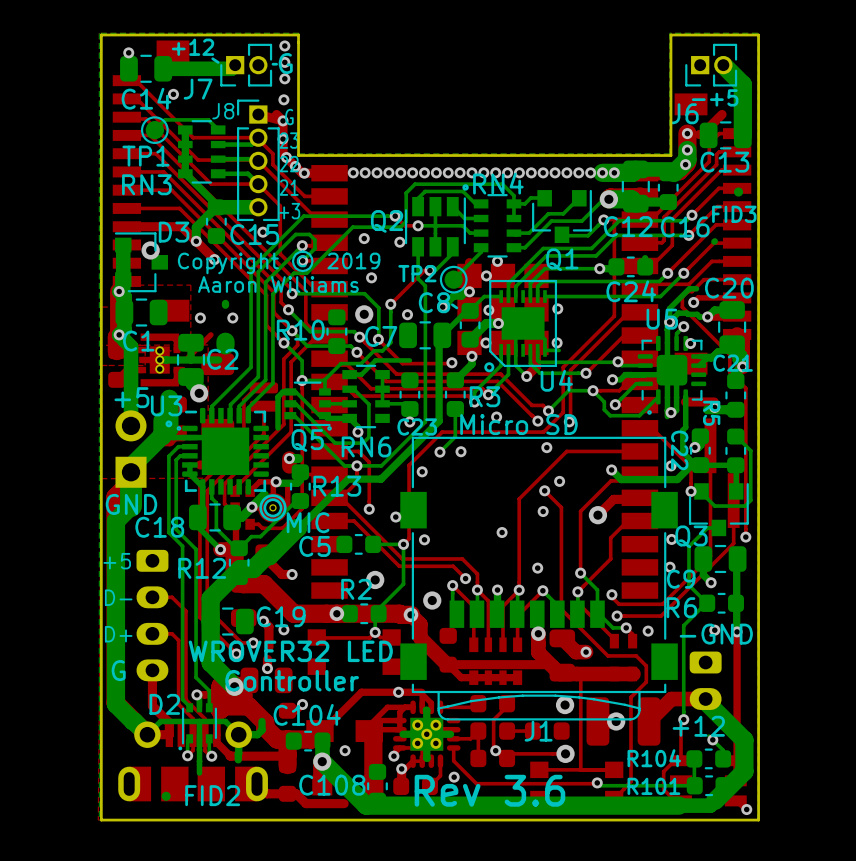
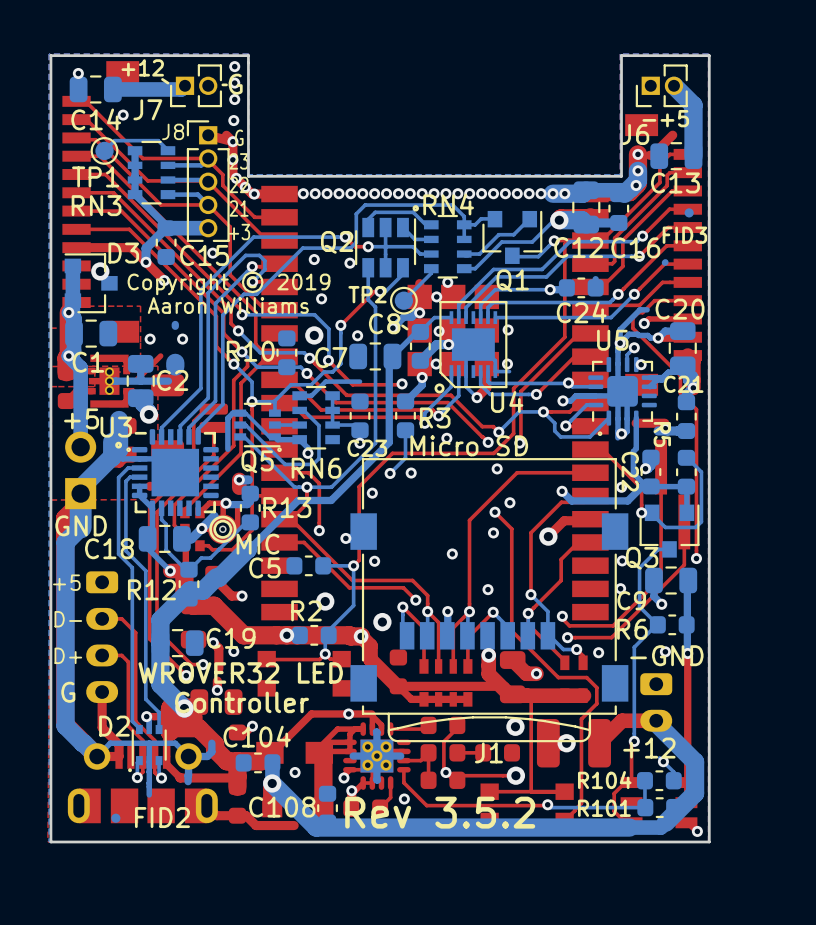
text: Rev 3.6 (489, 790) -> Rev 3.5.2 (440, 812)

